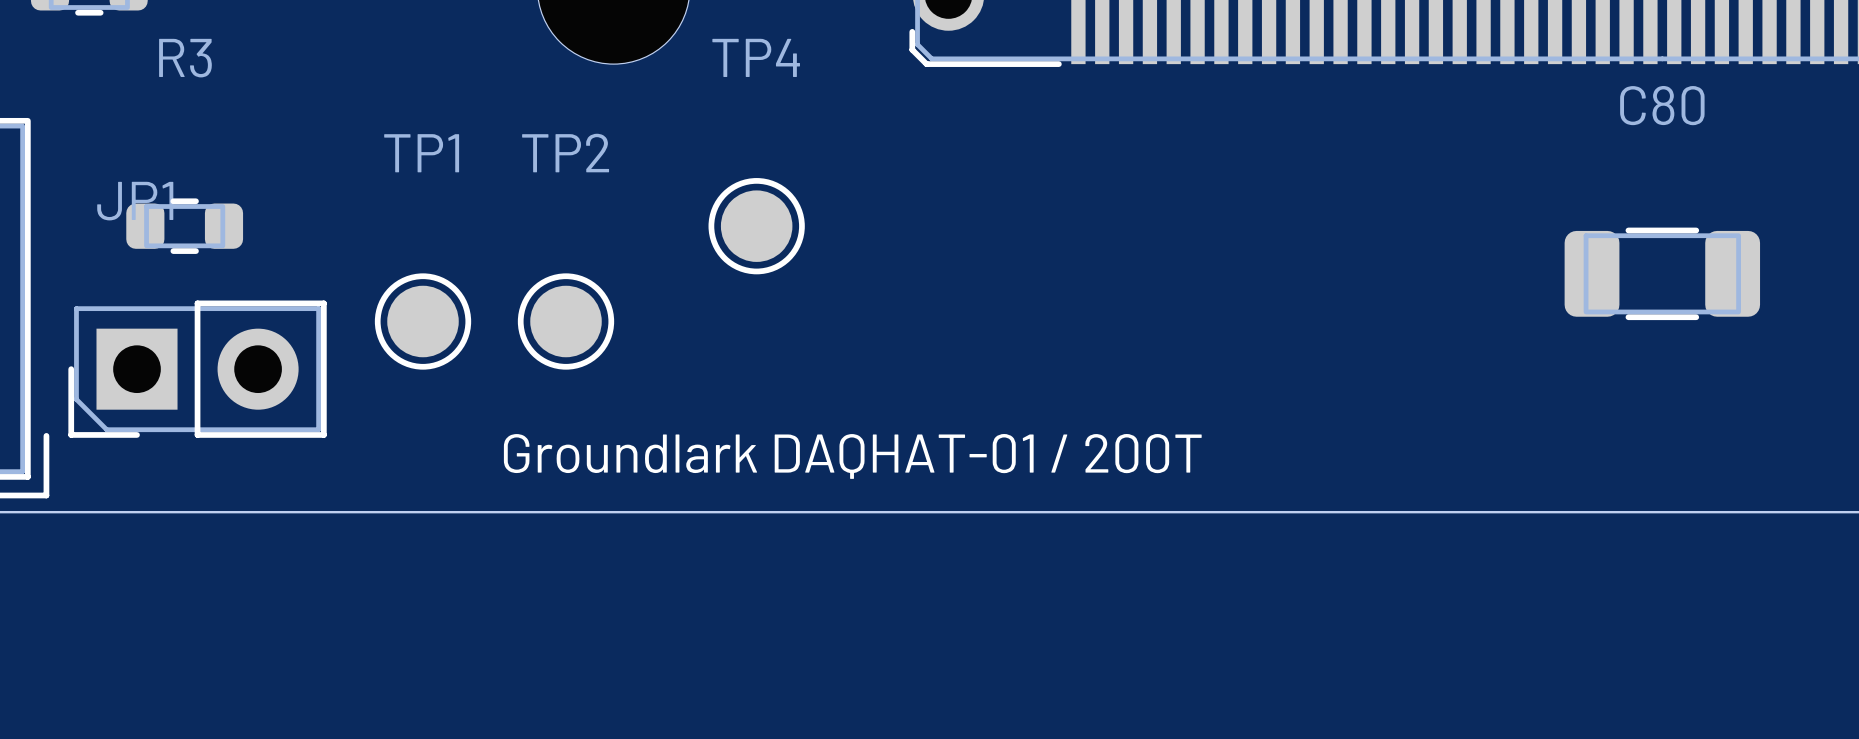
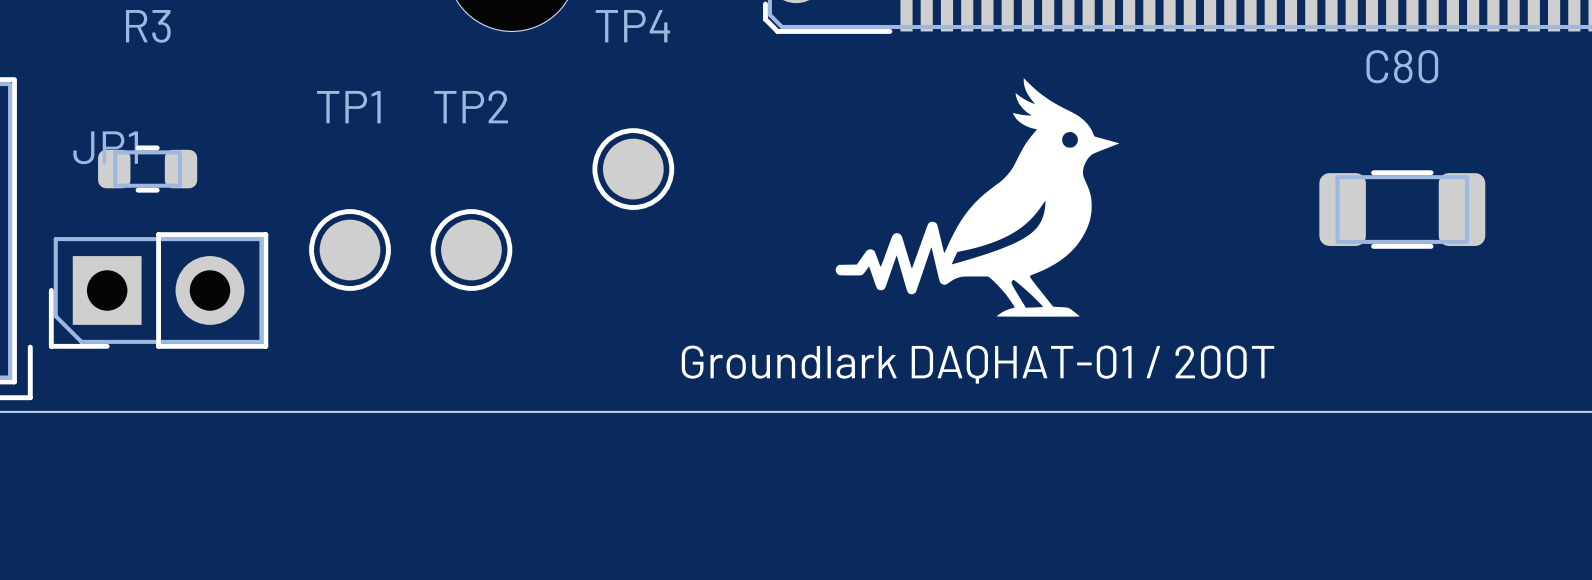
drawing: none -> [835, 78, 1120, 317]
text position: Groundlark DAQHAT-01 / 200T (852, 456) -> Groundlark DAQHAT-01 / 200T (978, 364)

